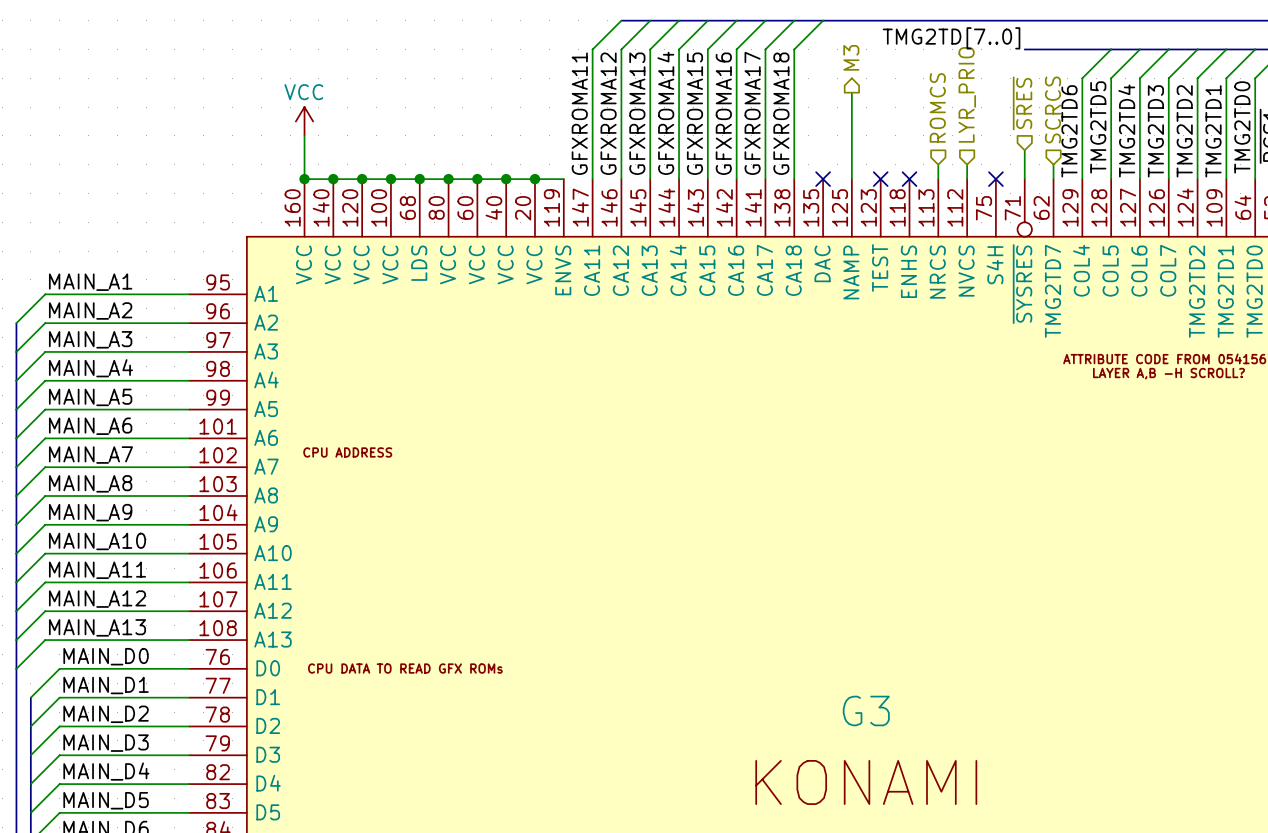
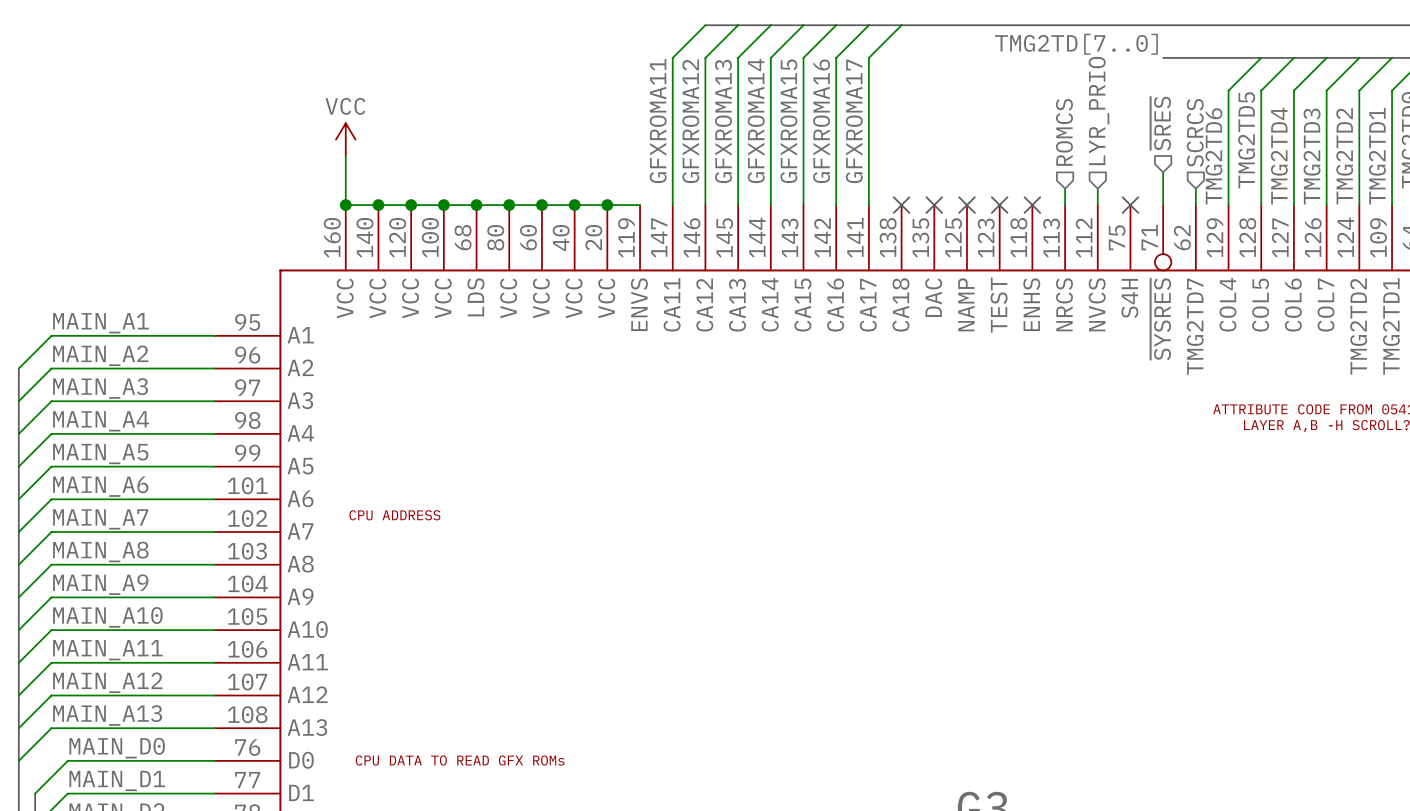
wire: (823, 20) (794, 49) (794, 179) -> none
hierarchical label: M3 (851, 57) -> none
wire: (851, 92) (851, 179) -> none
label: GFXROMA18 (781, 113) -> none
no-connect mark: none -> (901, 205)
no-connect mark: none -> (966, 205)

